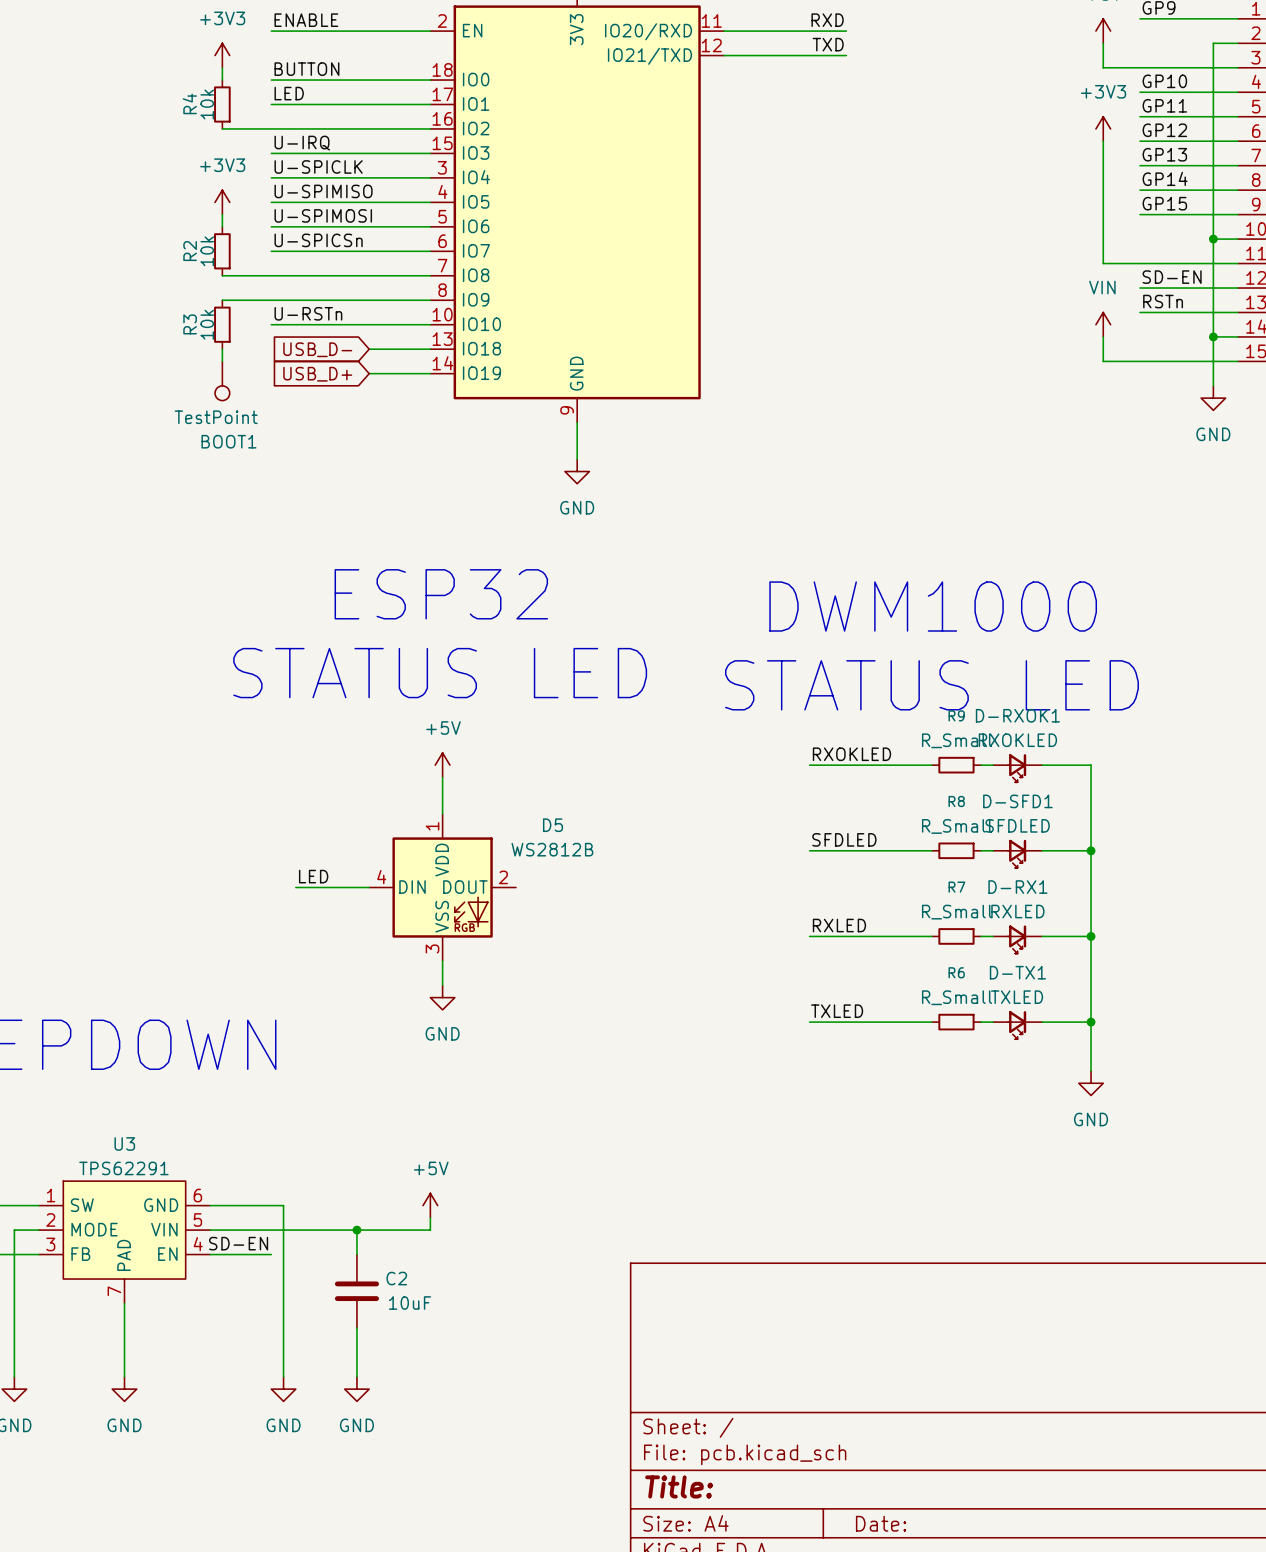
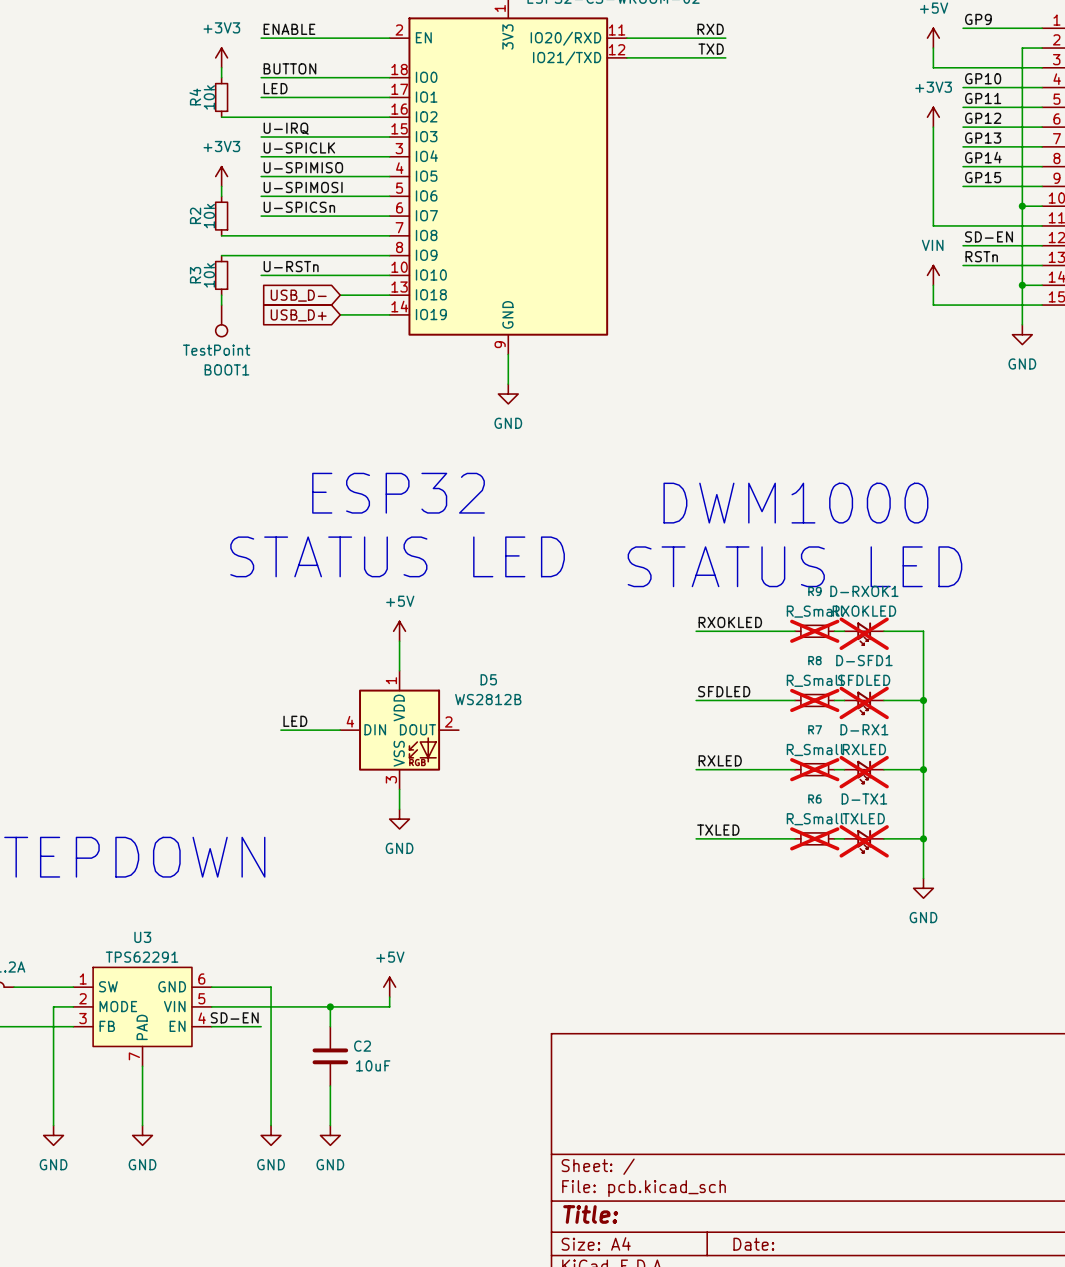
R9 do-not-place cross: none -> (814, 631)
D-RXOK1 do-not-place cross: none -> (864, 633)
R8 do-not-place cross: none -> (814, 700)
D-SFD1 do-not-place cross: none -> (864, 702)
R7 do-not-place cross: none -> (814, 769)
D-RX1 do-not-place cross: none -> (864, 772)
R6 do-not-place cross: none -> (814, 838)
D-TX1 do-not-place cross: none -> (864, 841)

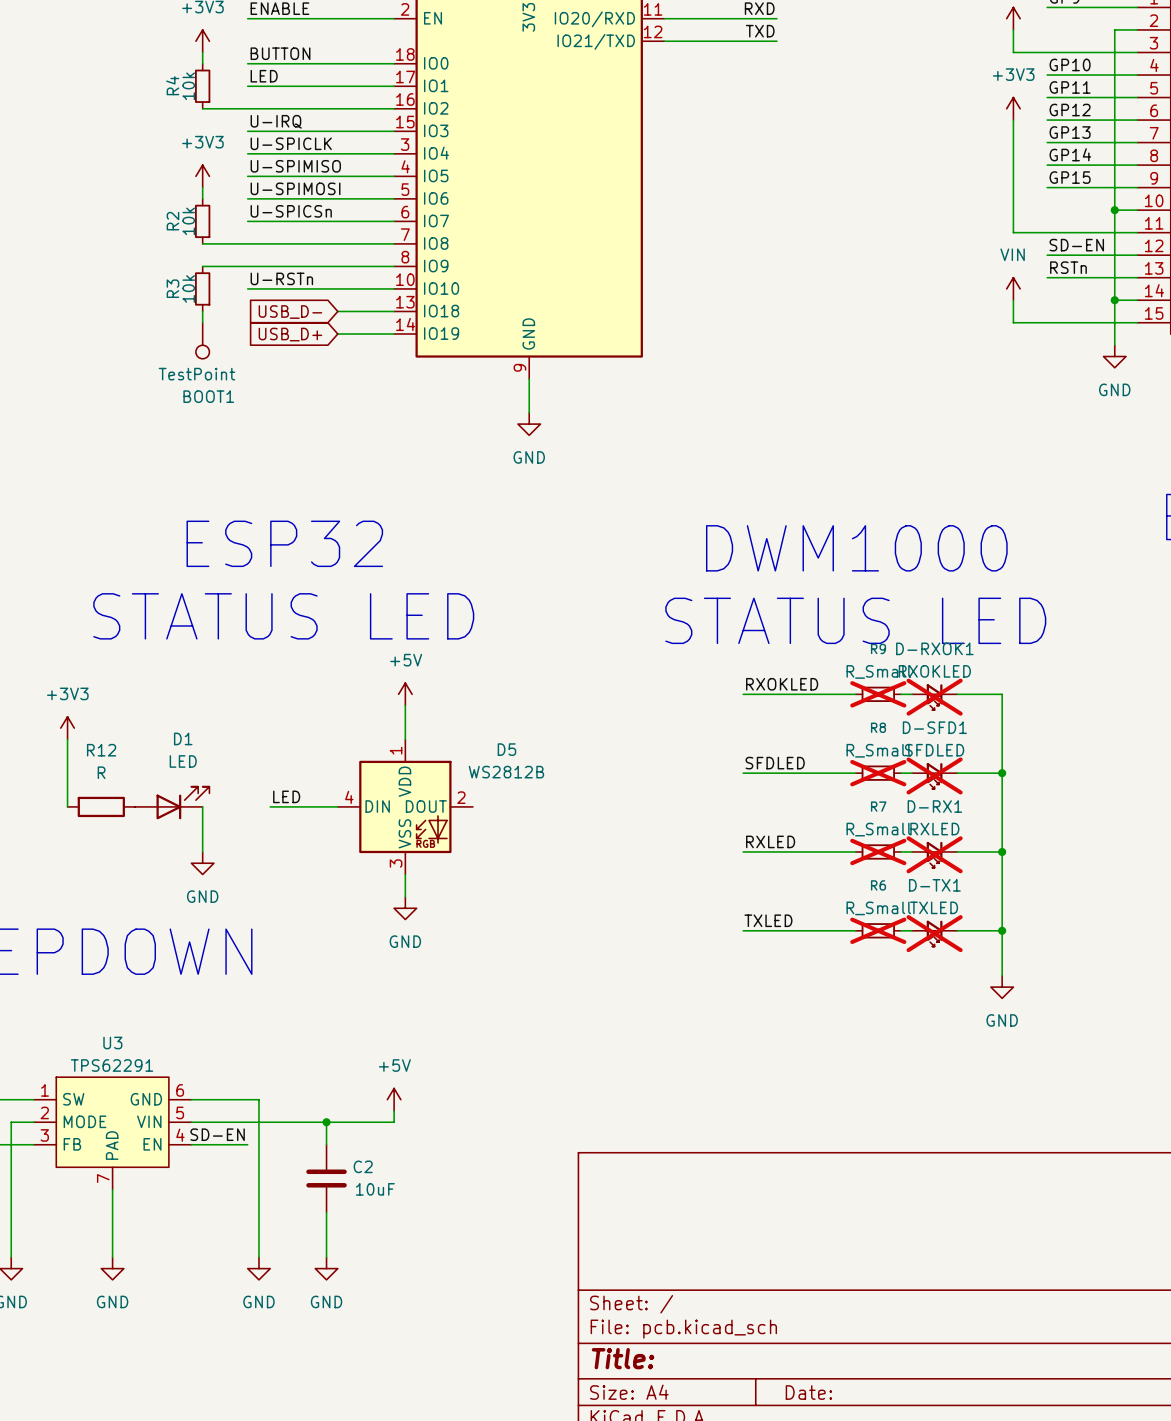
text position: ESP32 (398, 493) -> ESP32 (284, 543)
text position: STATUS LED (397, 556) -> STATUS LED (283, 616)
power symbol: none -> +3V3 (67, 728)
wire: none -> (67, 739) (67, 806)
D1: none -> LED (172, 803)
R12: none -> R (101, 806)
wire: none -> (202, 806) (202, 851)
power symbol: none -> GND (202, 863)

